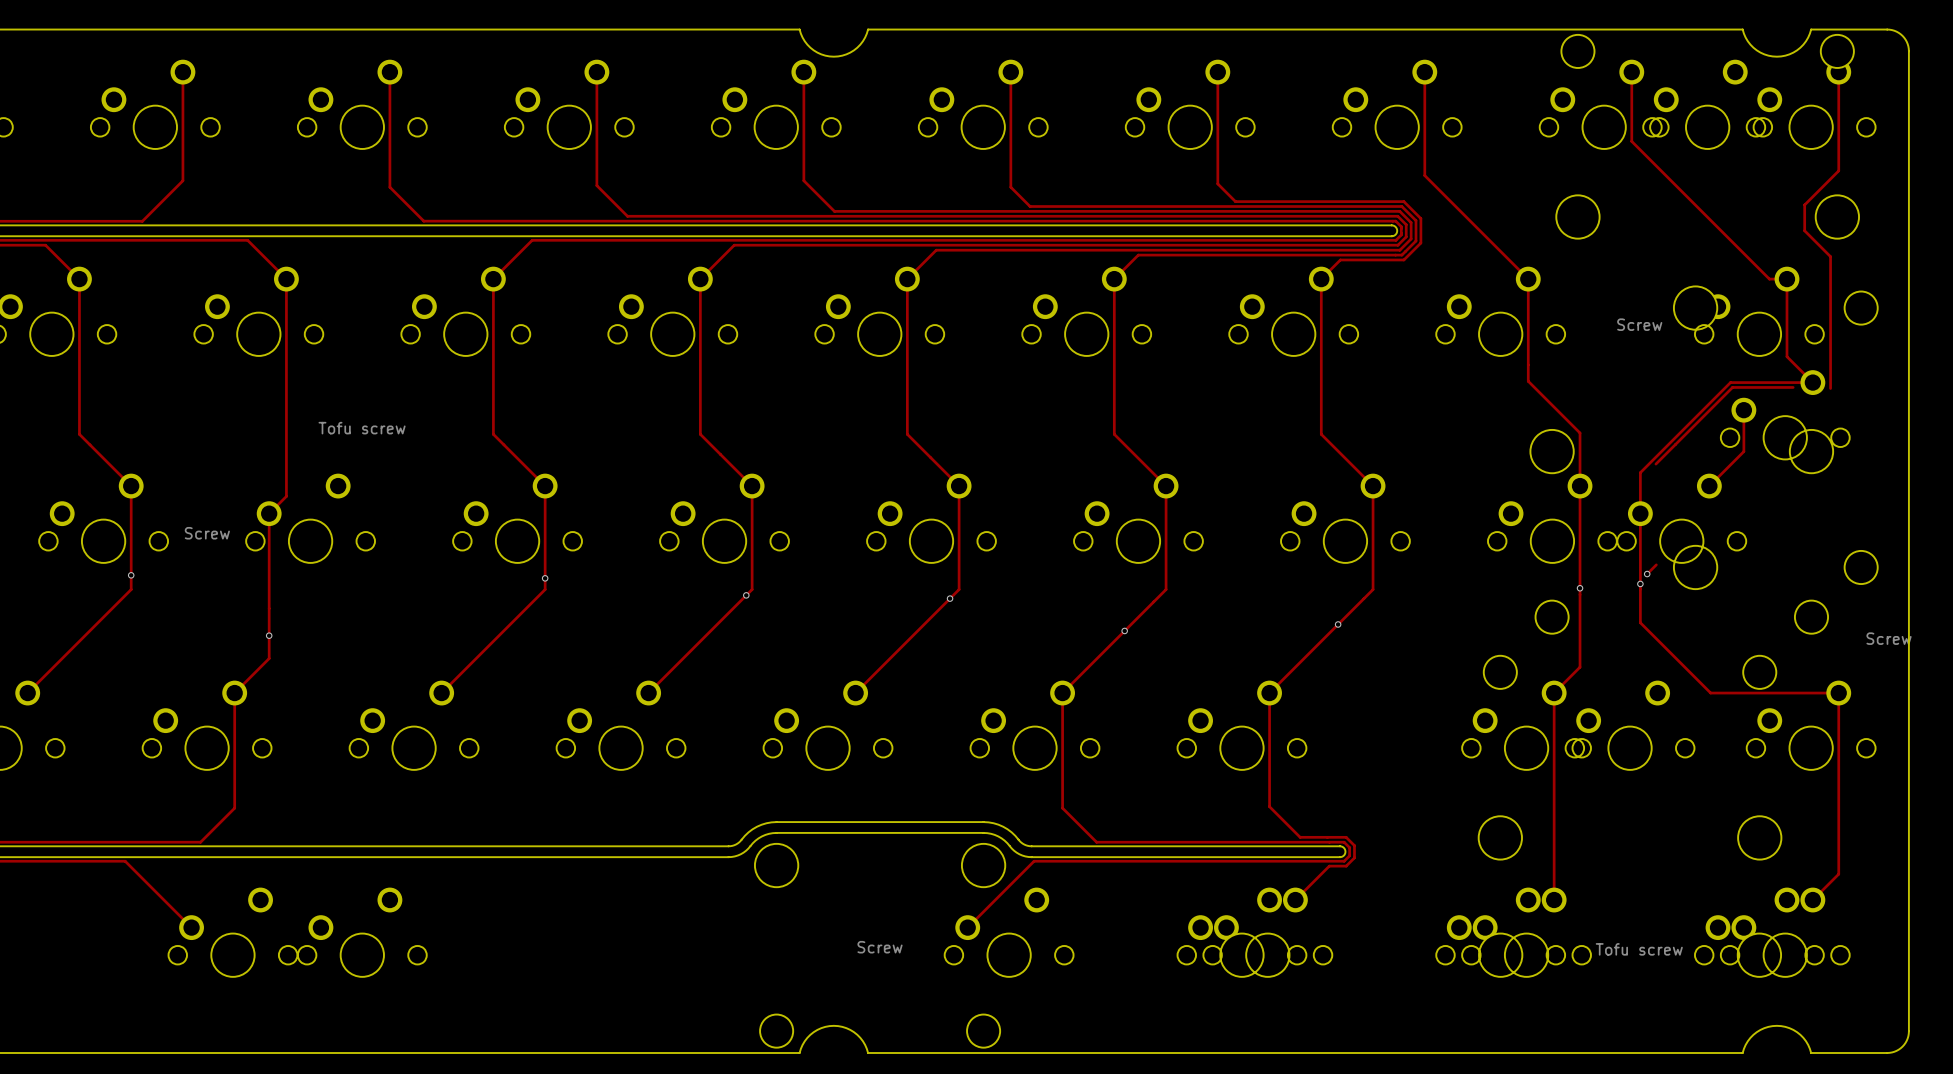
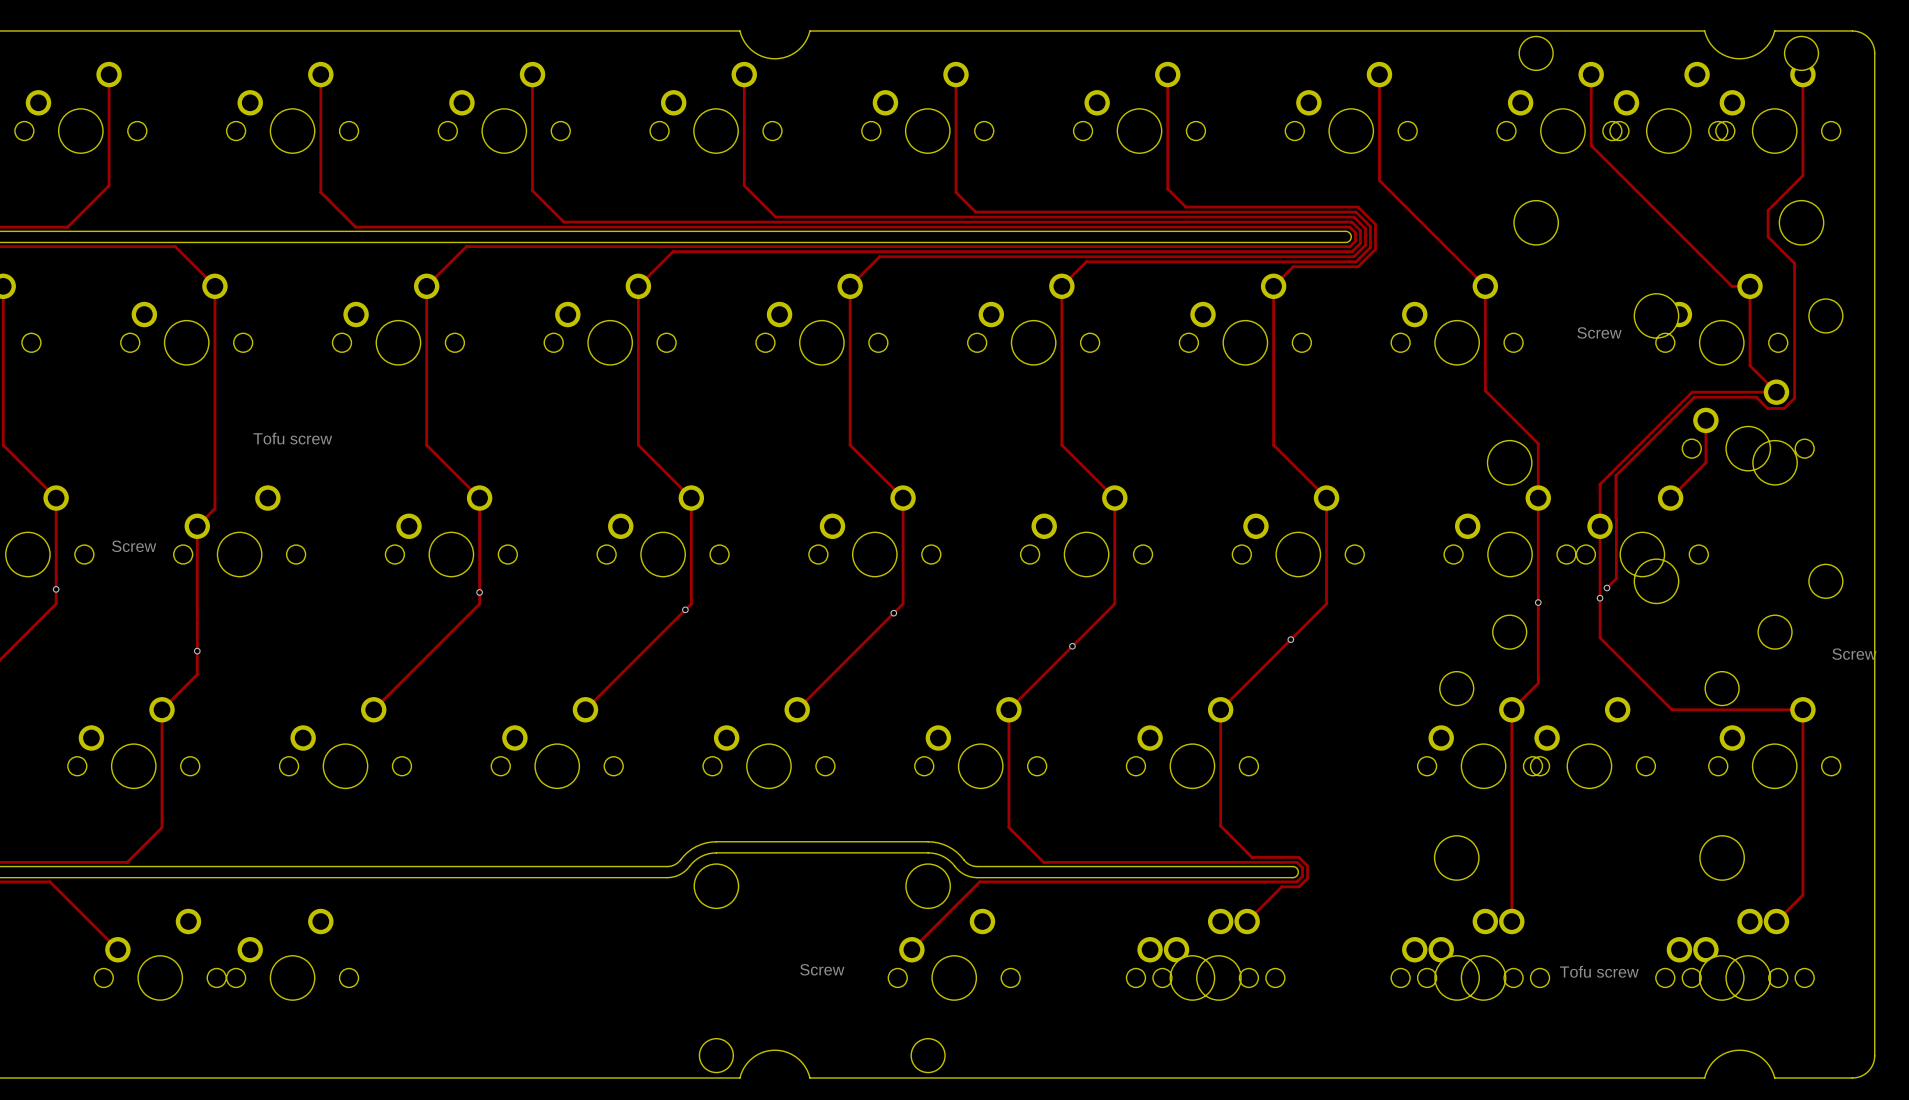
track: none -> (1756, 397) (1767, 408) (1784, 408) (1794, 398)
track: none -> (1615, 475) (1616, 578)

